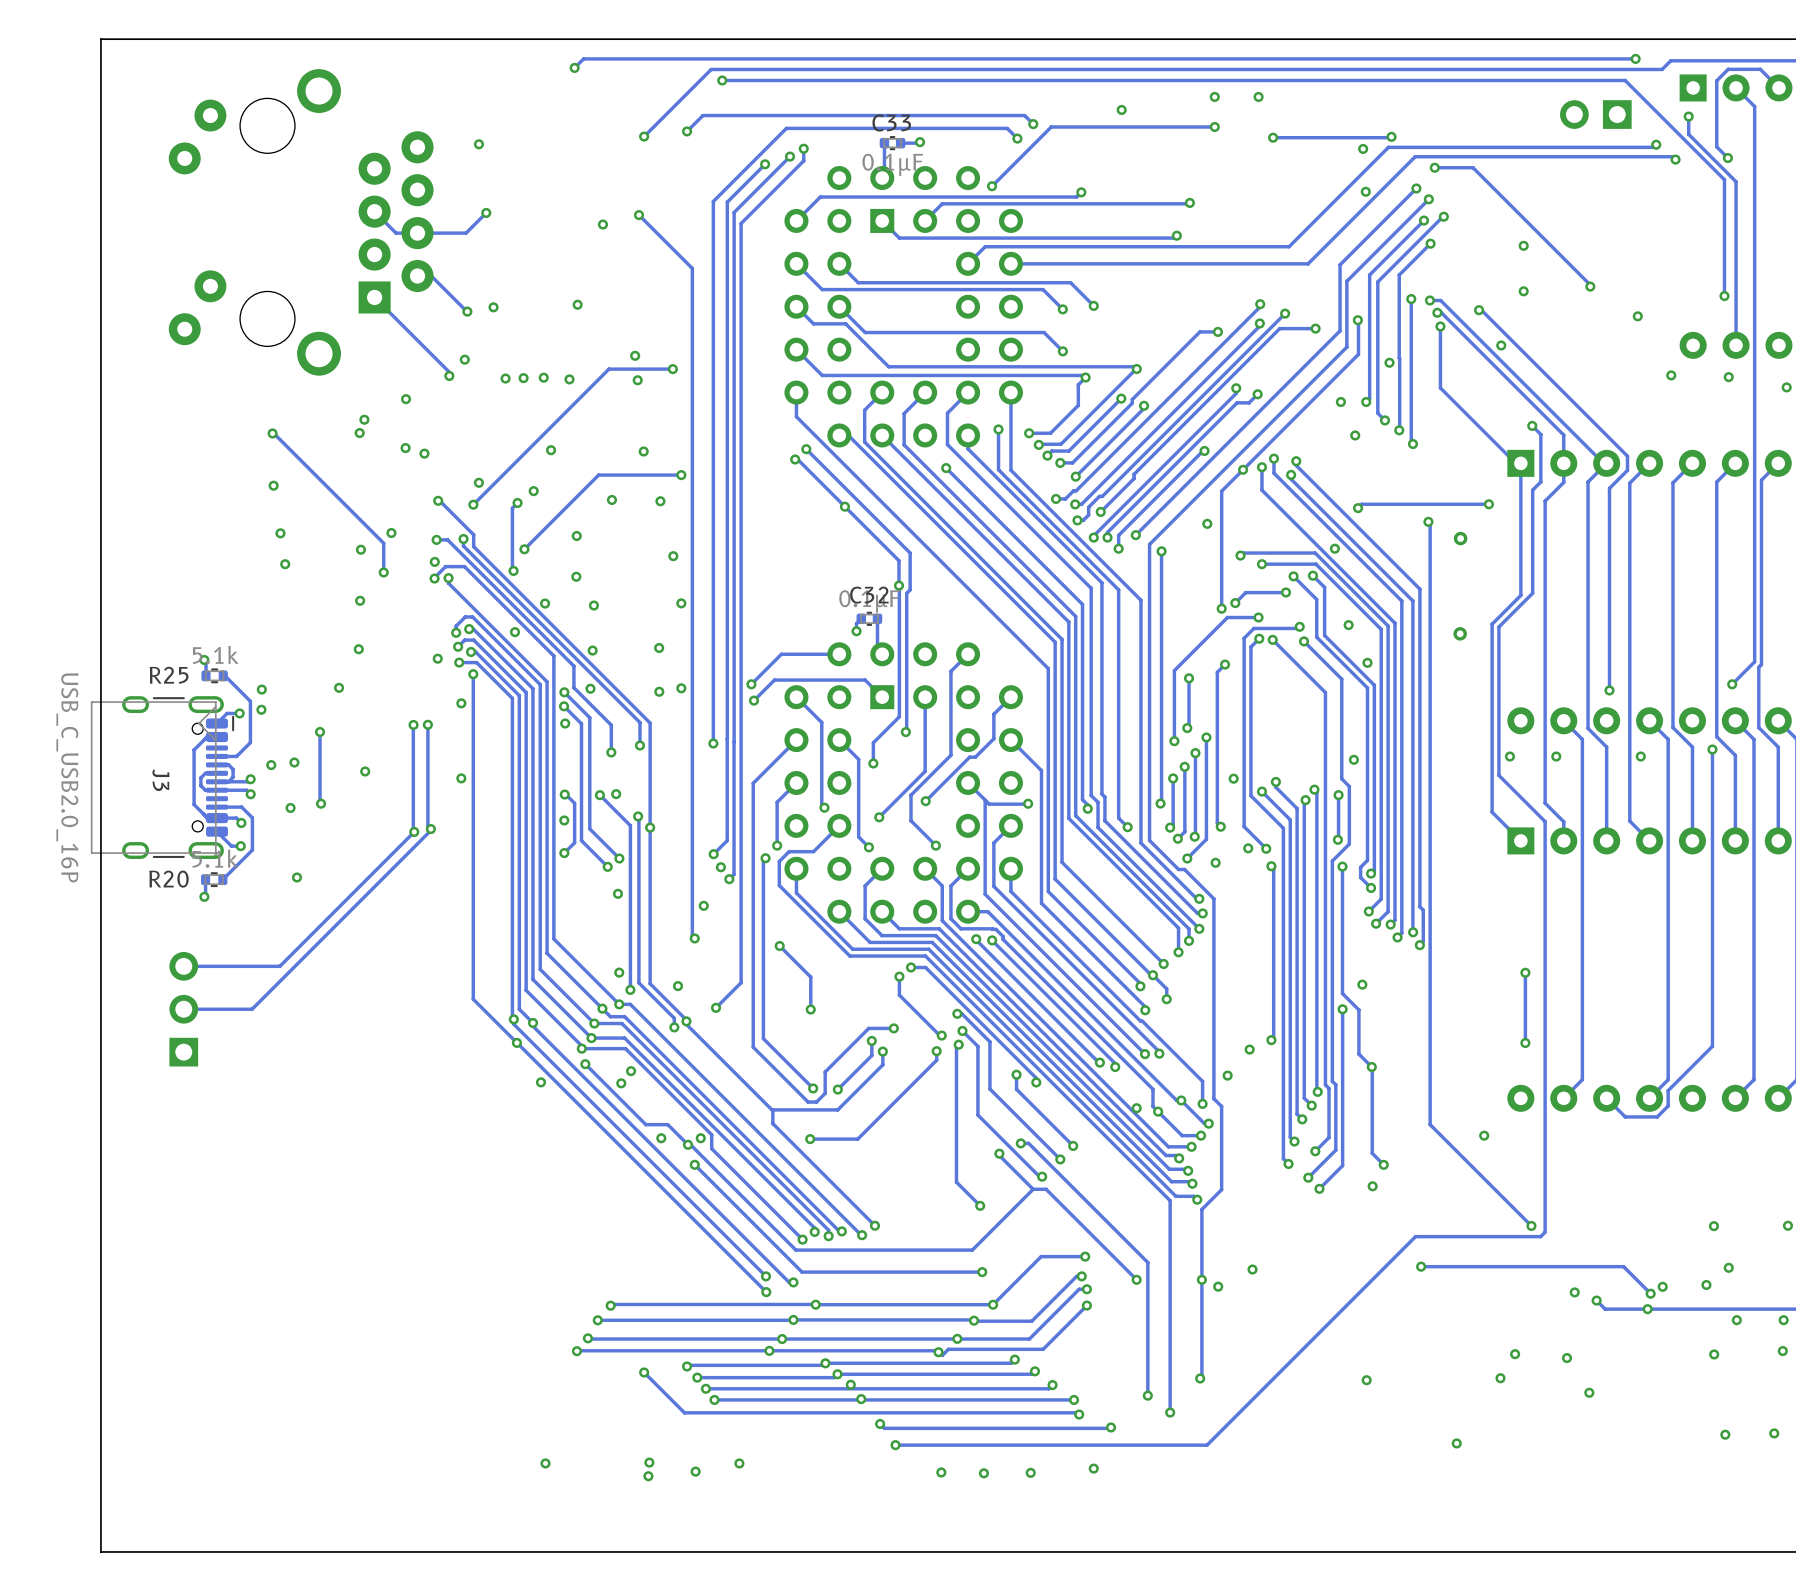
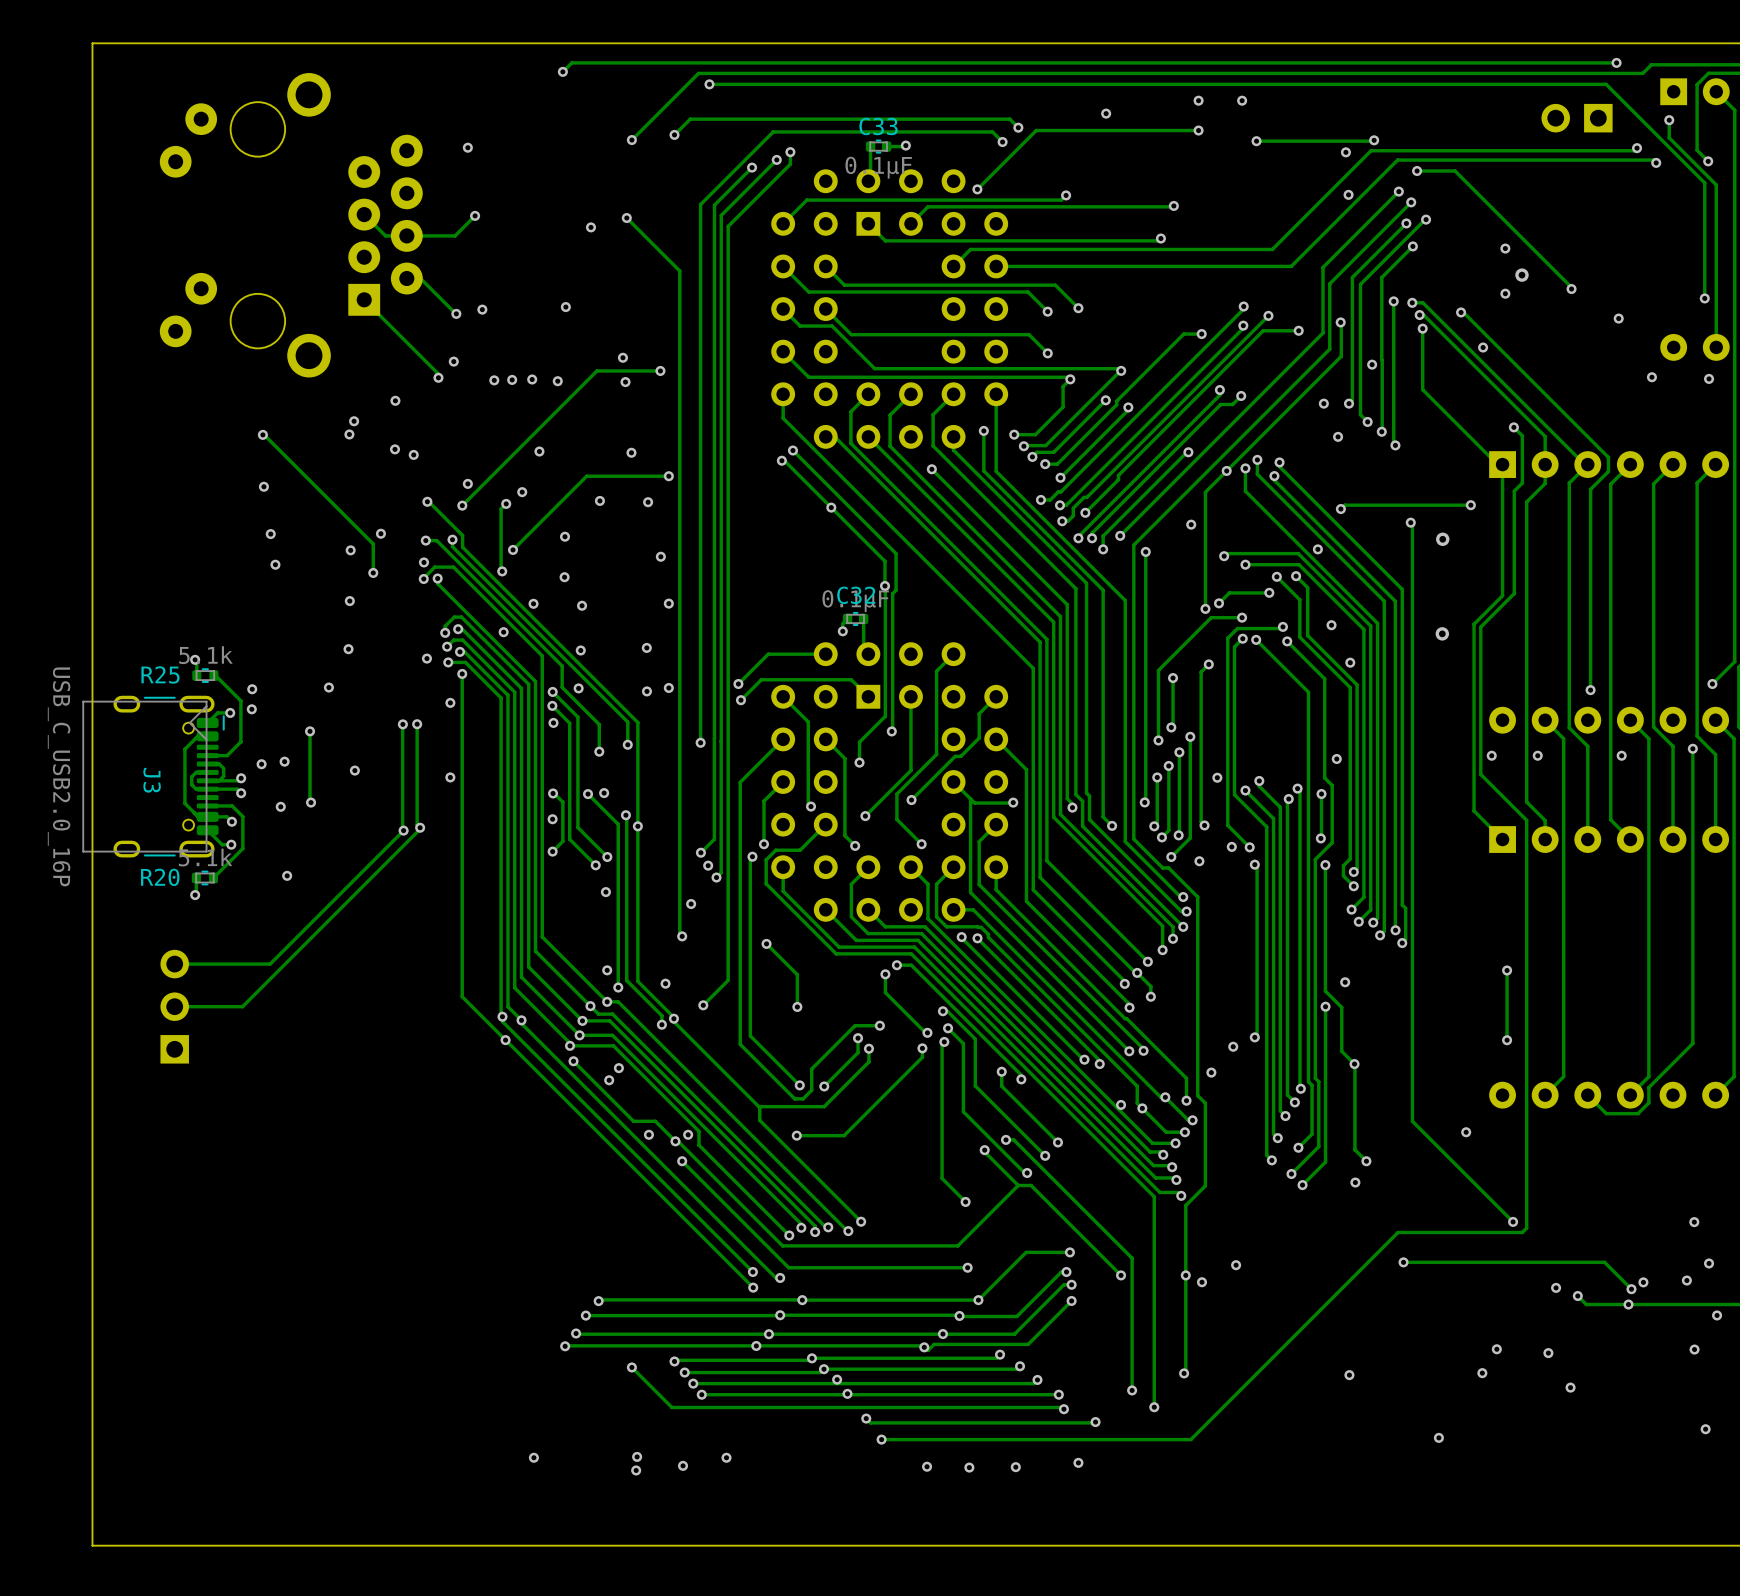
via: none -> (1521, 275)
via: (540, 1082) -> none

